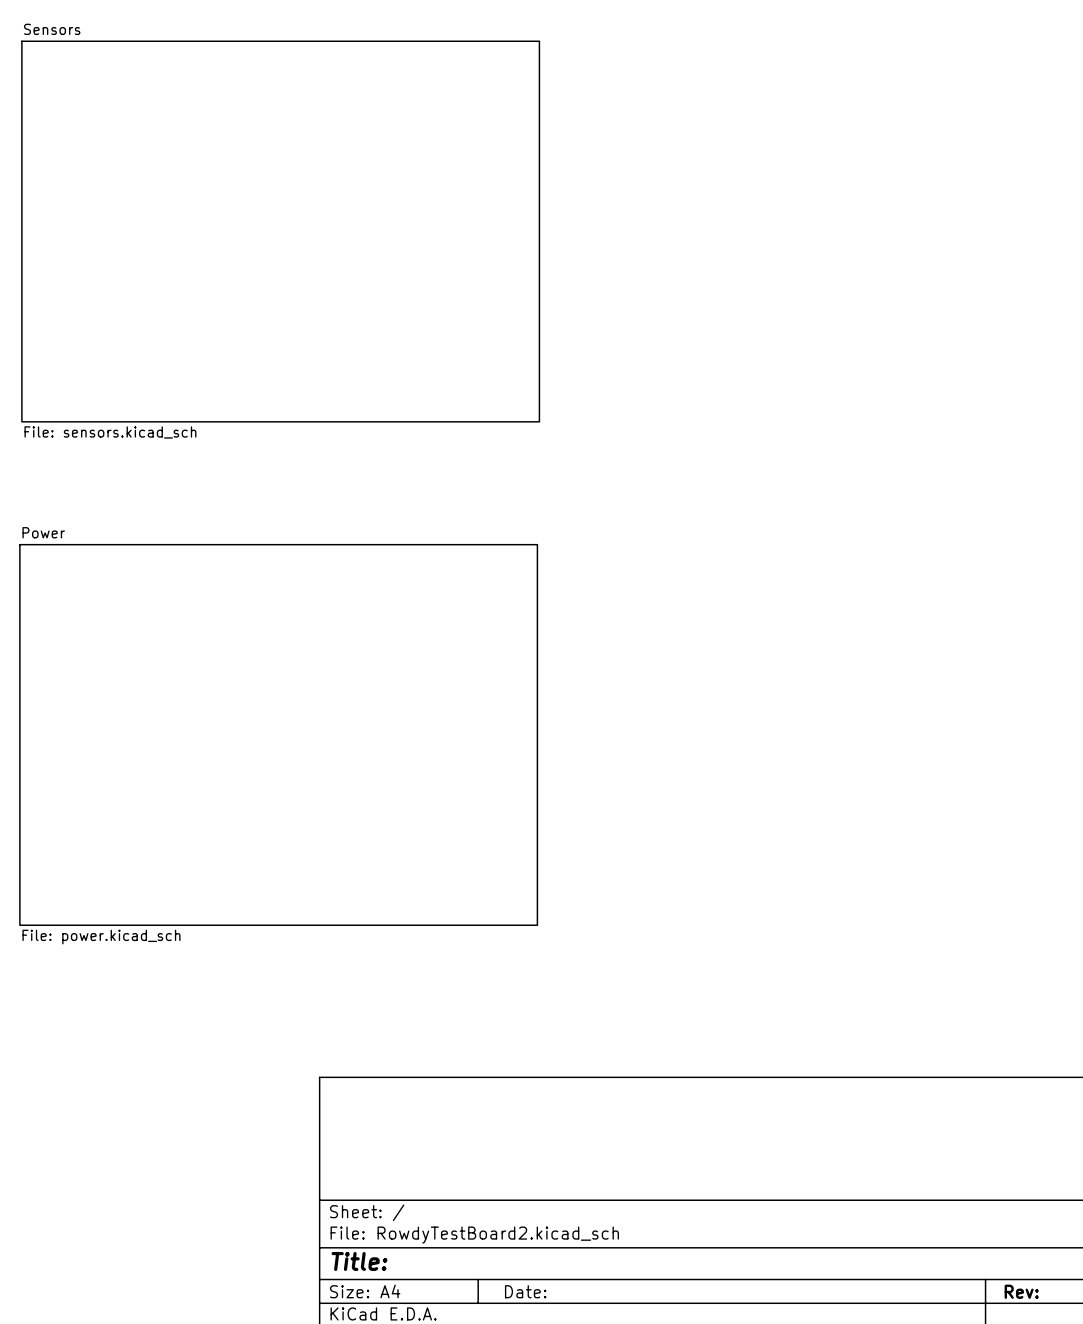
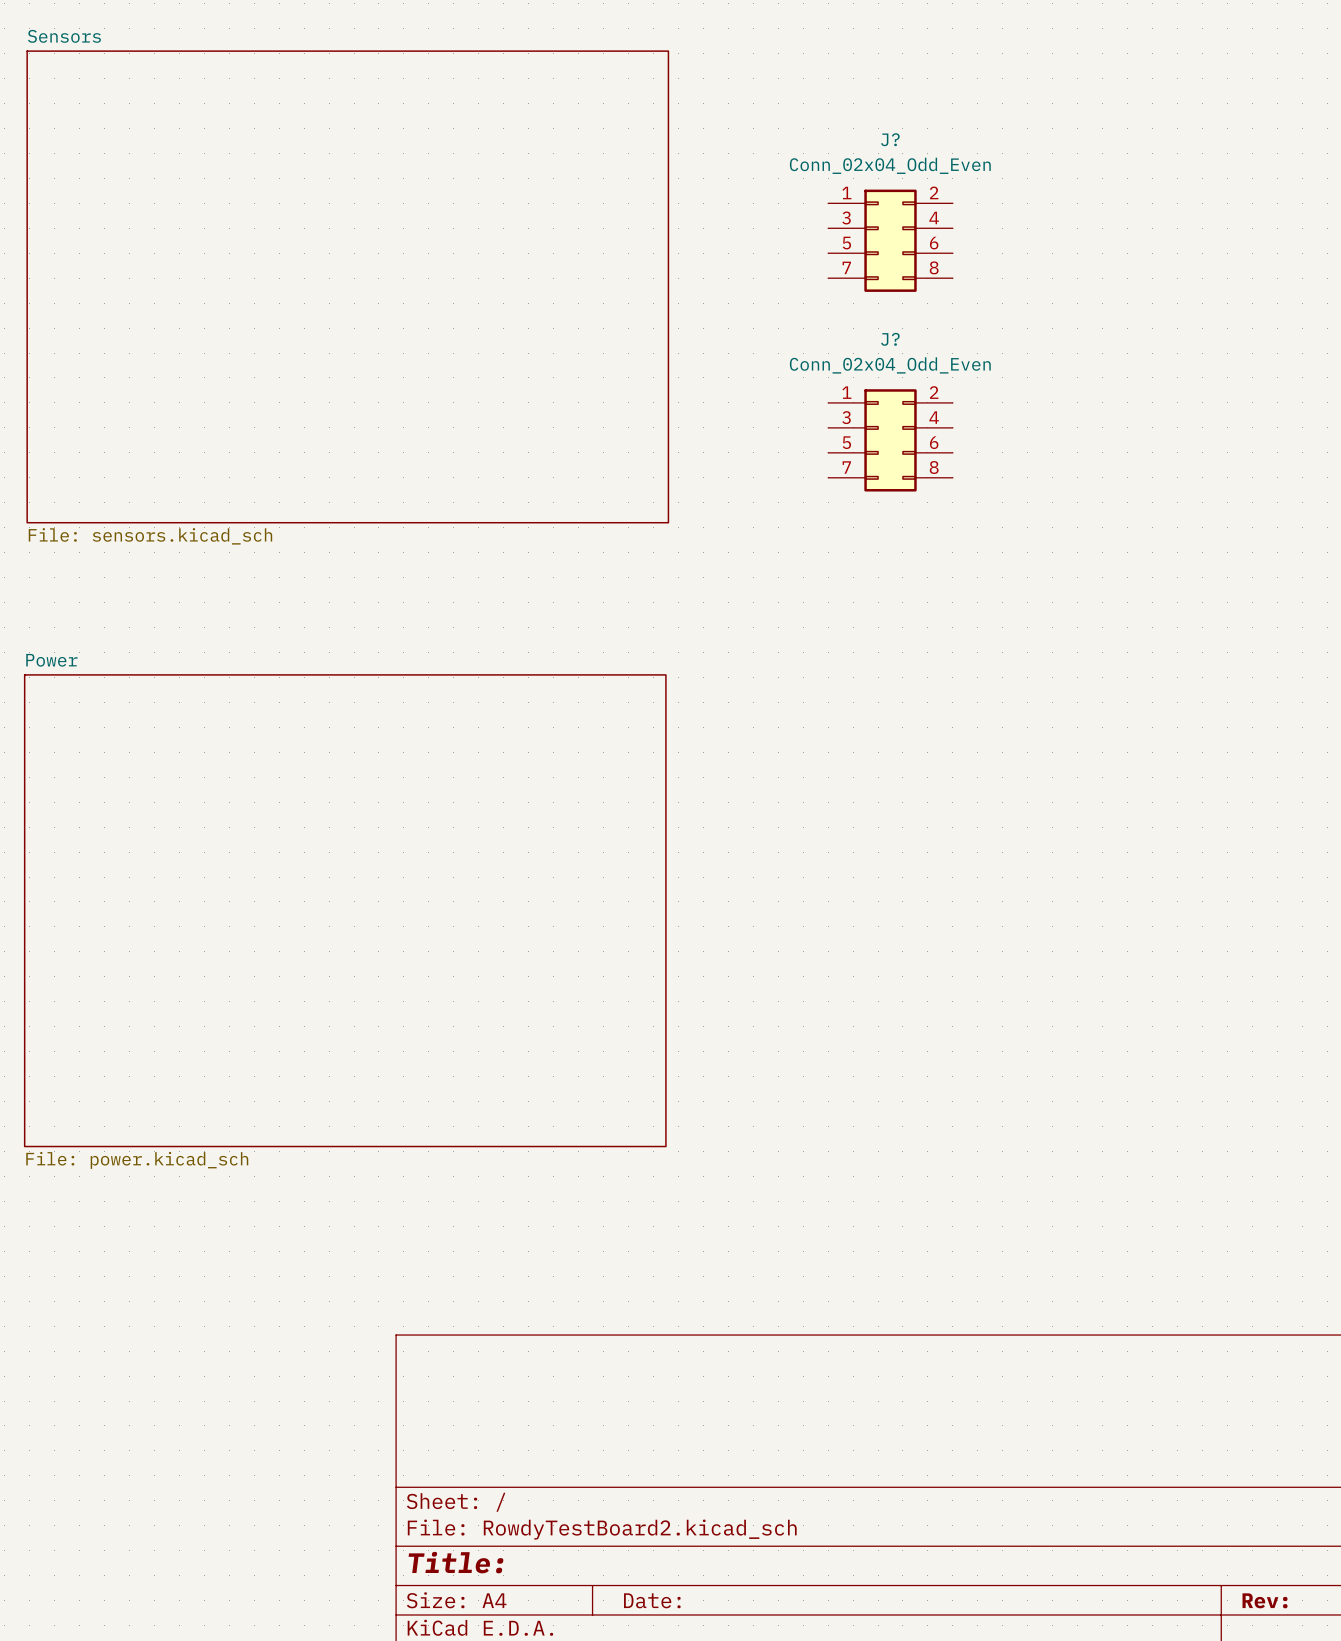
J?: none -> Conn_02x04_Odd_Even (890, 240)
J?: none -> Conn_02x04_Odd_Even (890, 440)

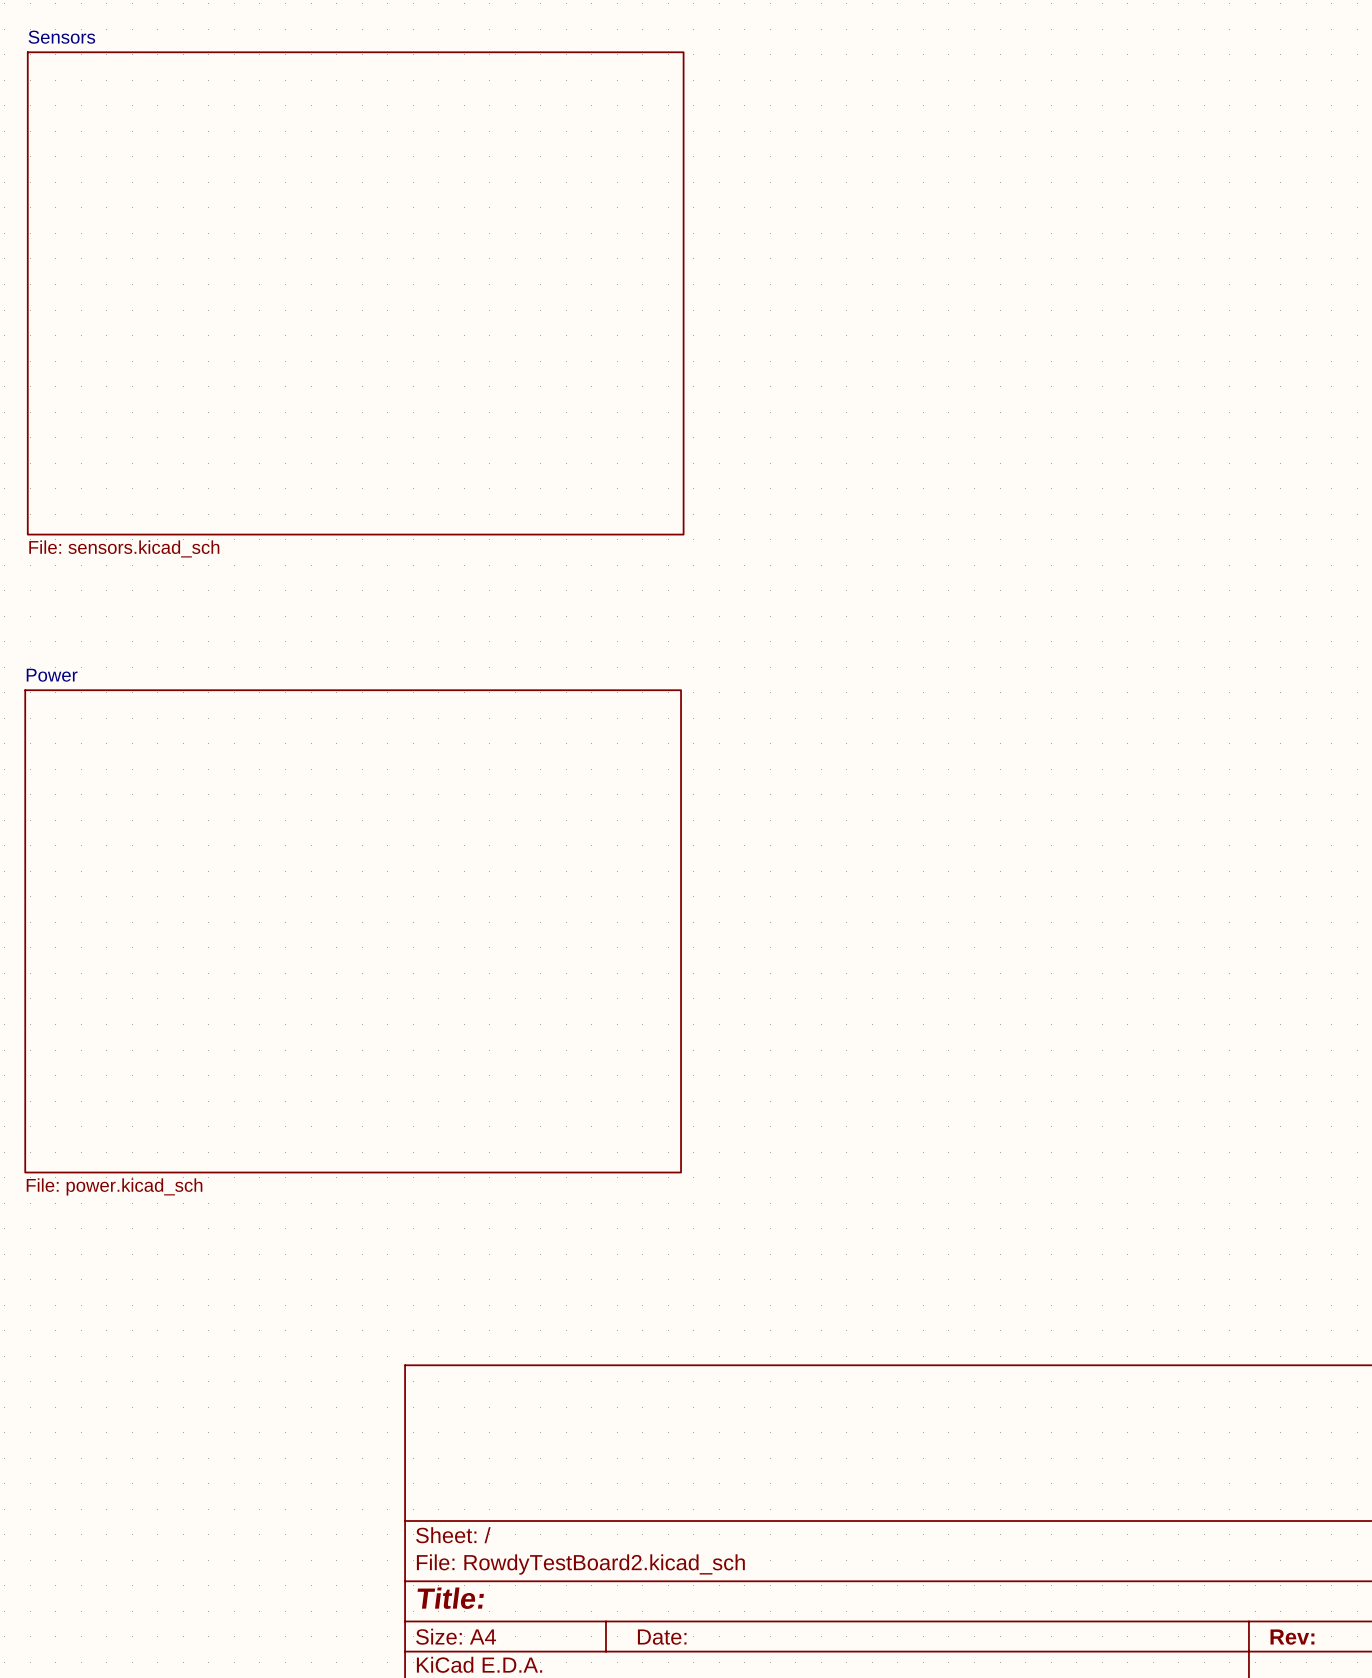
J?: Conn_02x04_Odd_Even (890, 240) -> none
J?: Conn_02x04_Odd_Even (890, 440) -> none

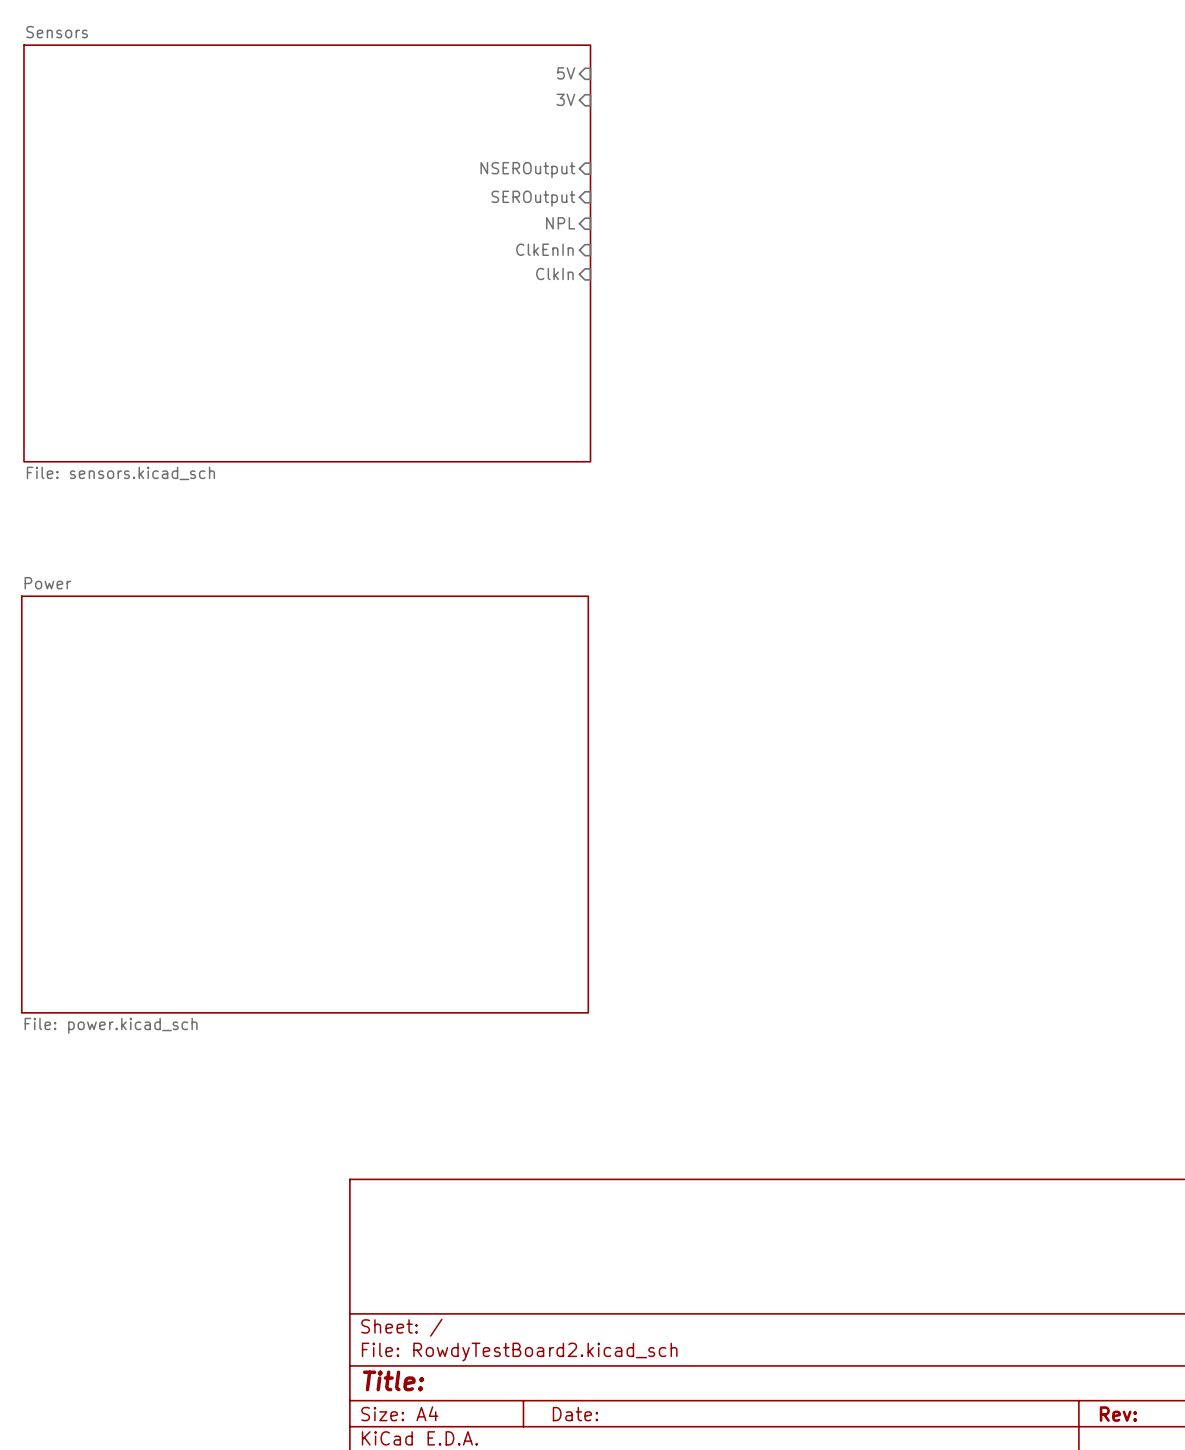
sheet pin: none -> 5V (566, 73)
sheet pin: none -> 3V (565, 99)
sheet pin: none -> NSEROutput (527, 170)
sheet pin: none -> SEROutput (533, 198)
sheet pin: none -> NPL (560, 223)
sheet pin: none -> ClkEnIn (544, 249)
sheet pin: none -> ClkIn (554, 273)

